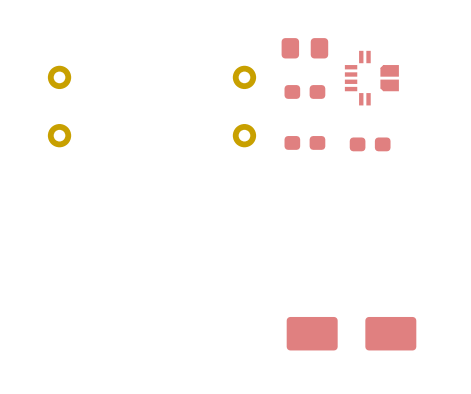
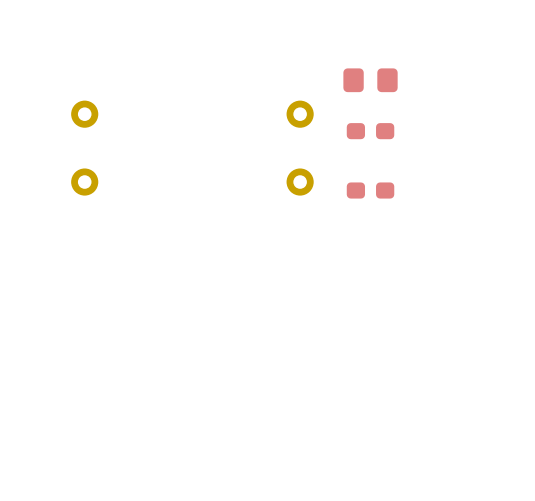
part: (371, 78) -> none
part: (370, 144) -> none
part: (351, 333) -> none

